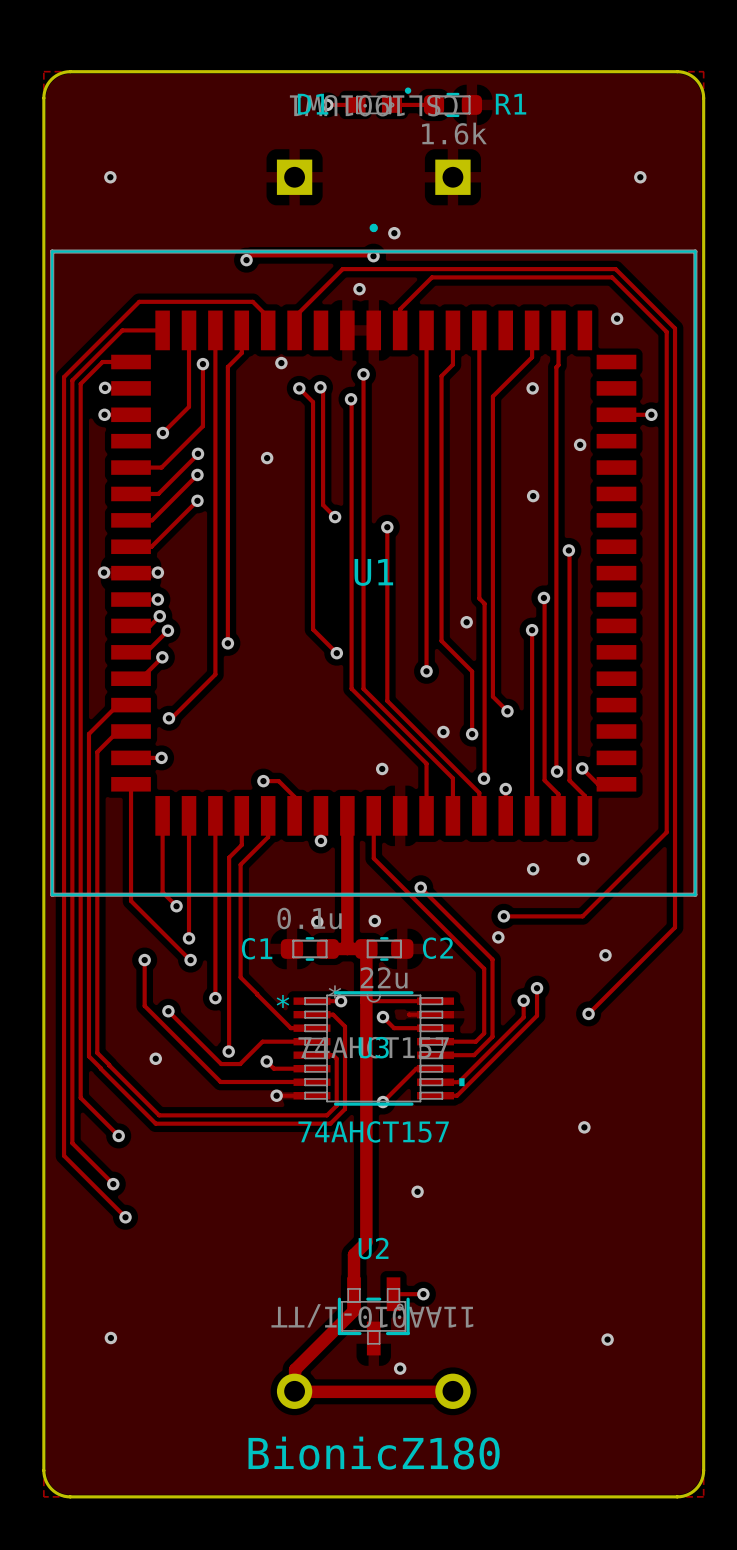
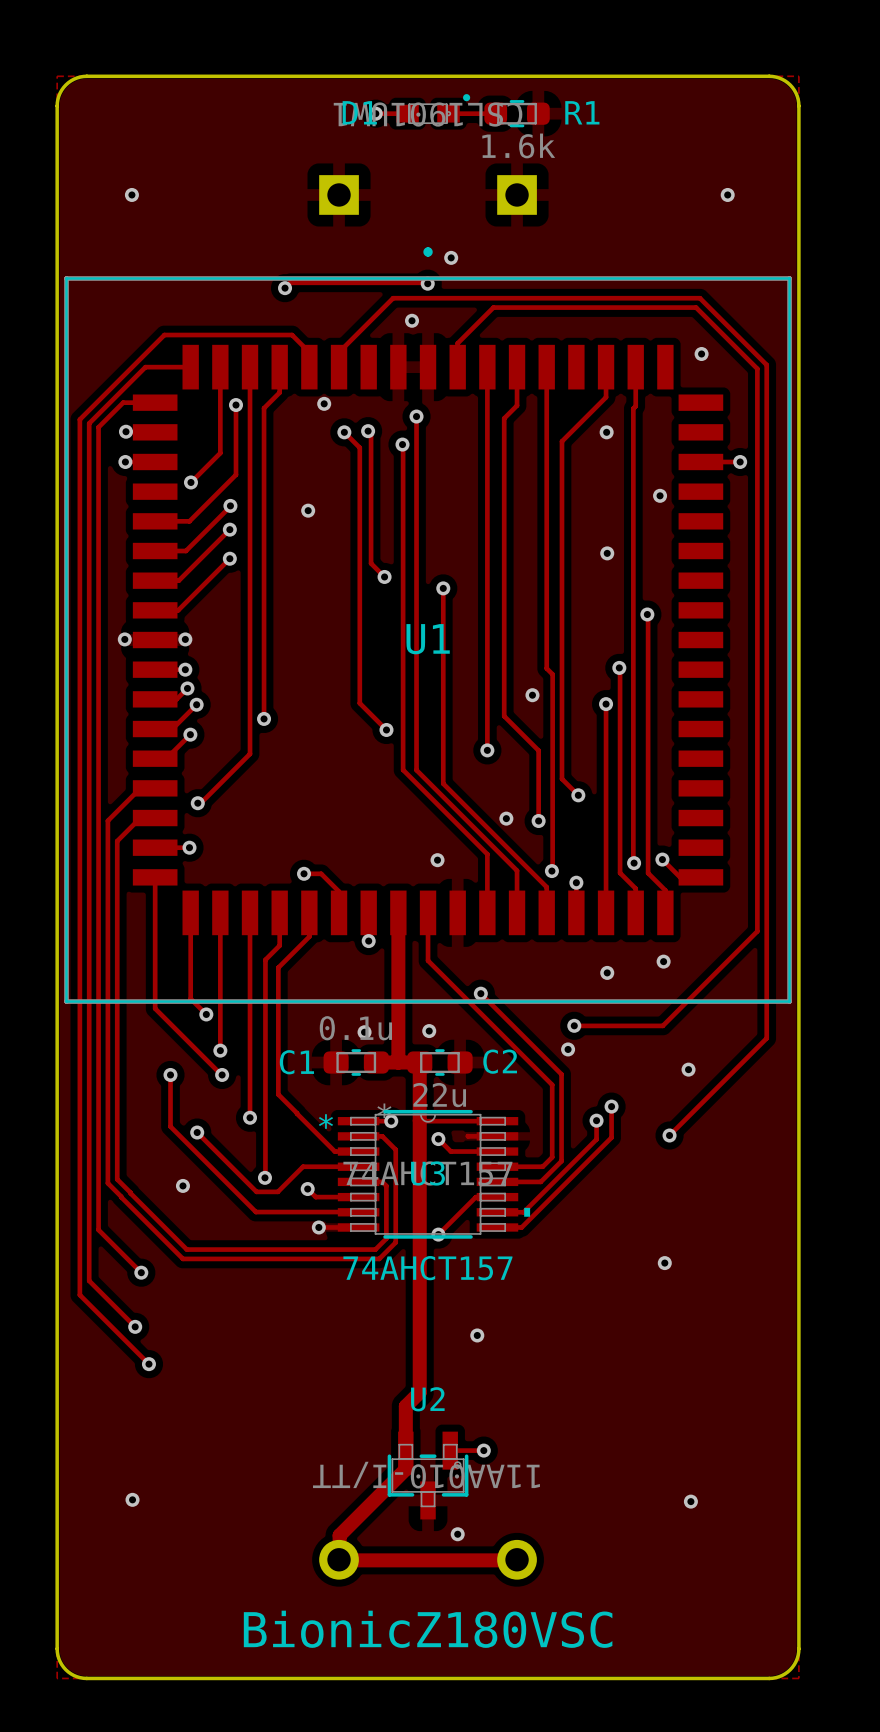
text: BionicZ180 (374, 1453) -> BionicZ180VSC (428, 1629)

